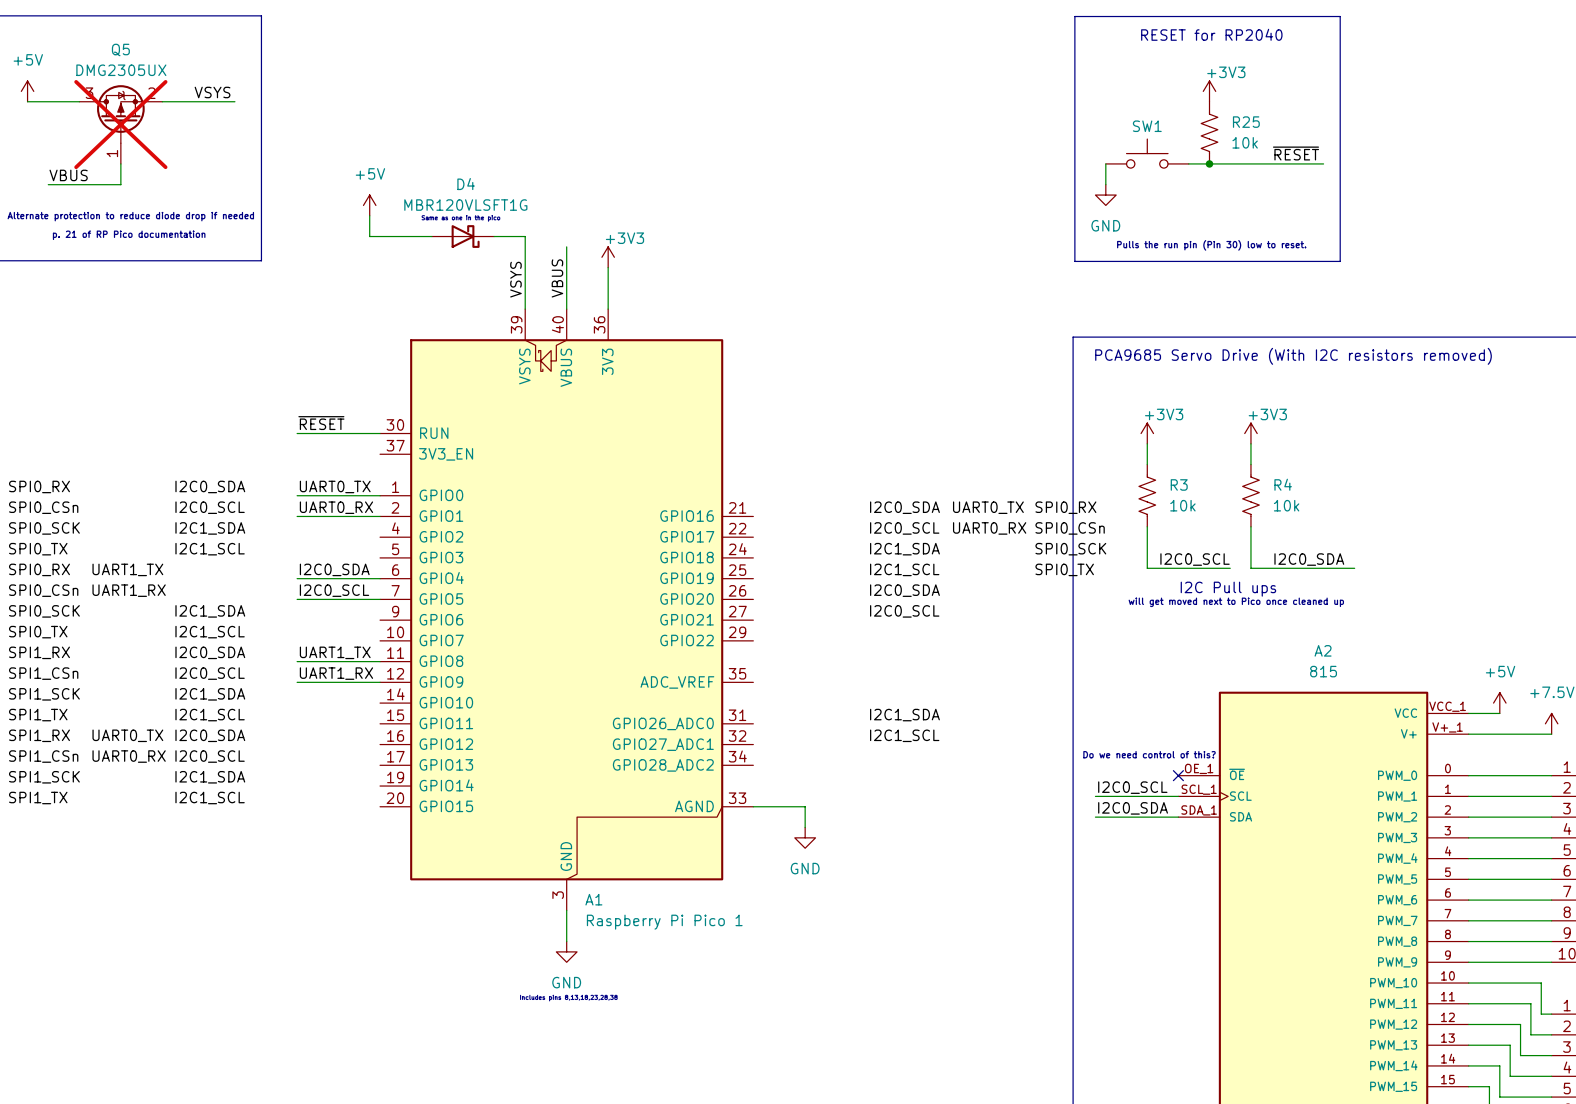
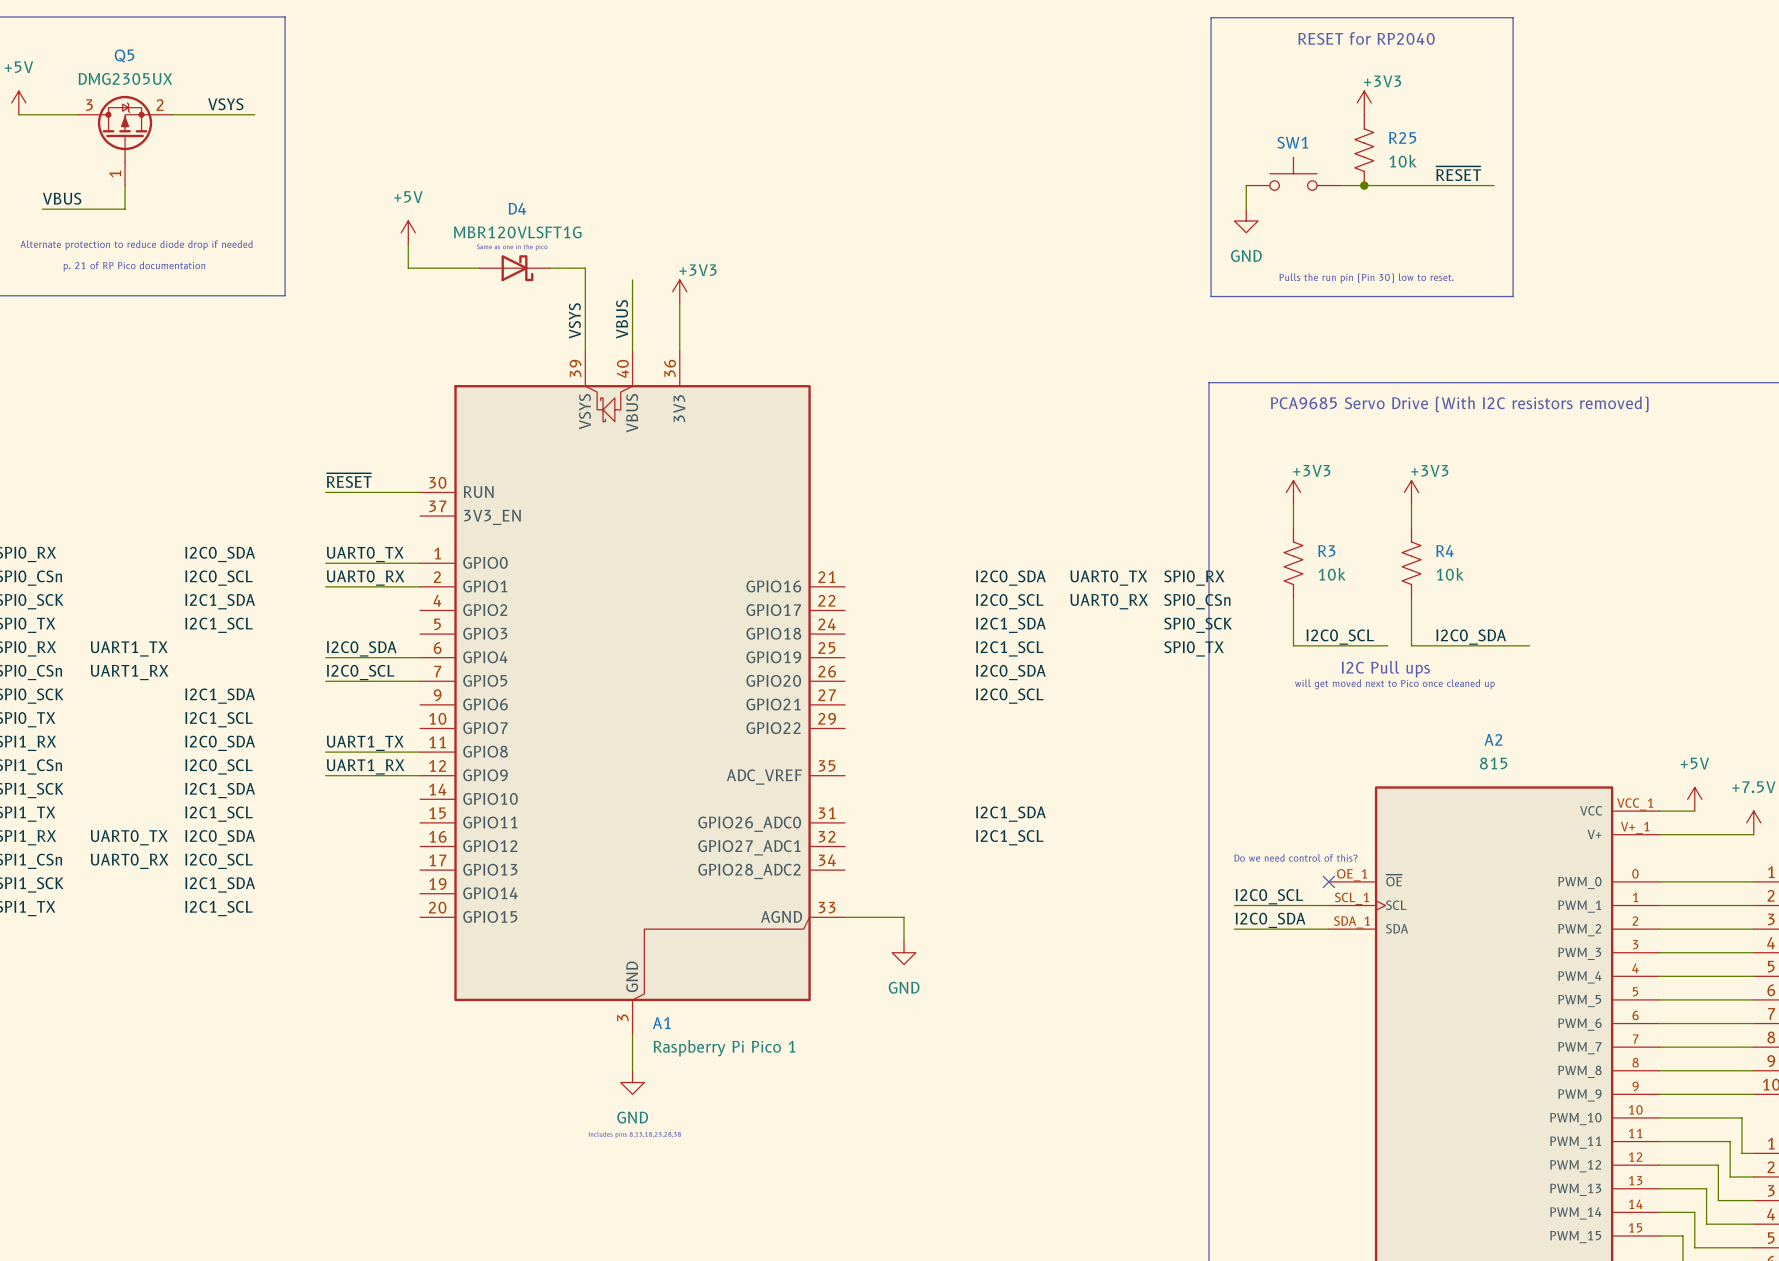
Q5 do-not-place cross: (120, 124) -> none

